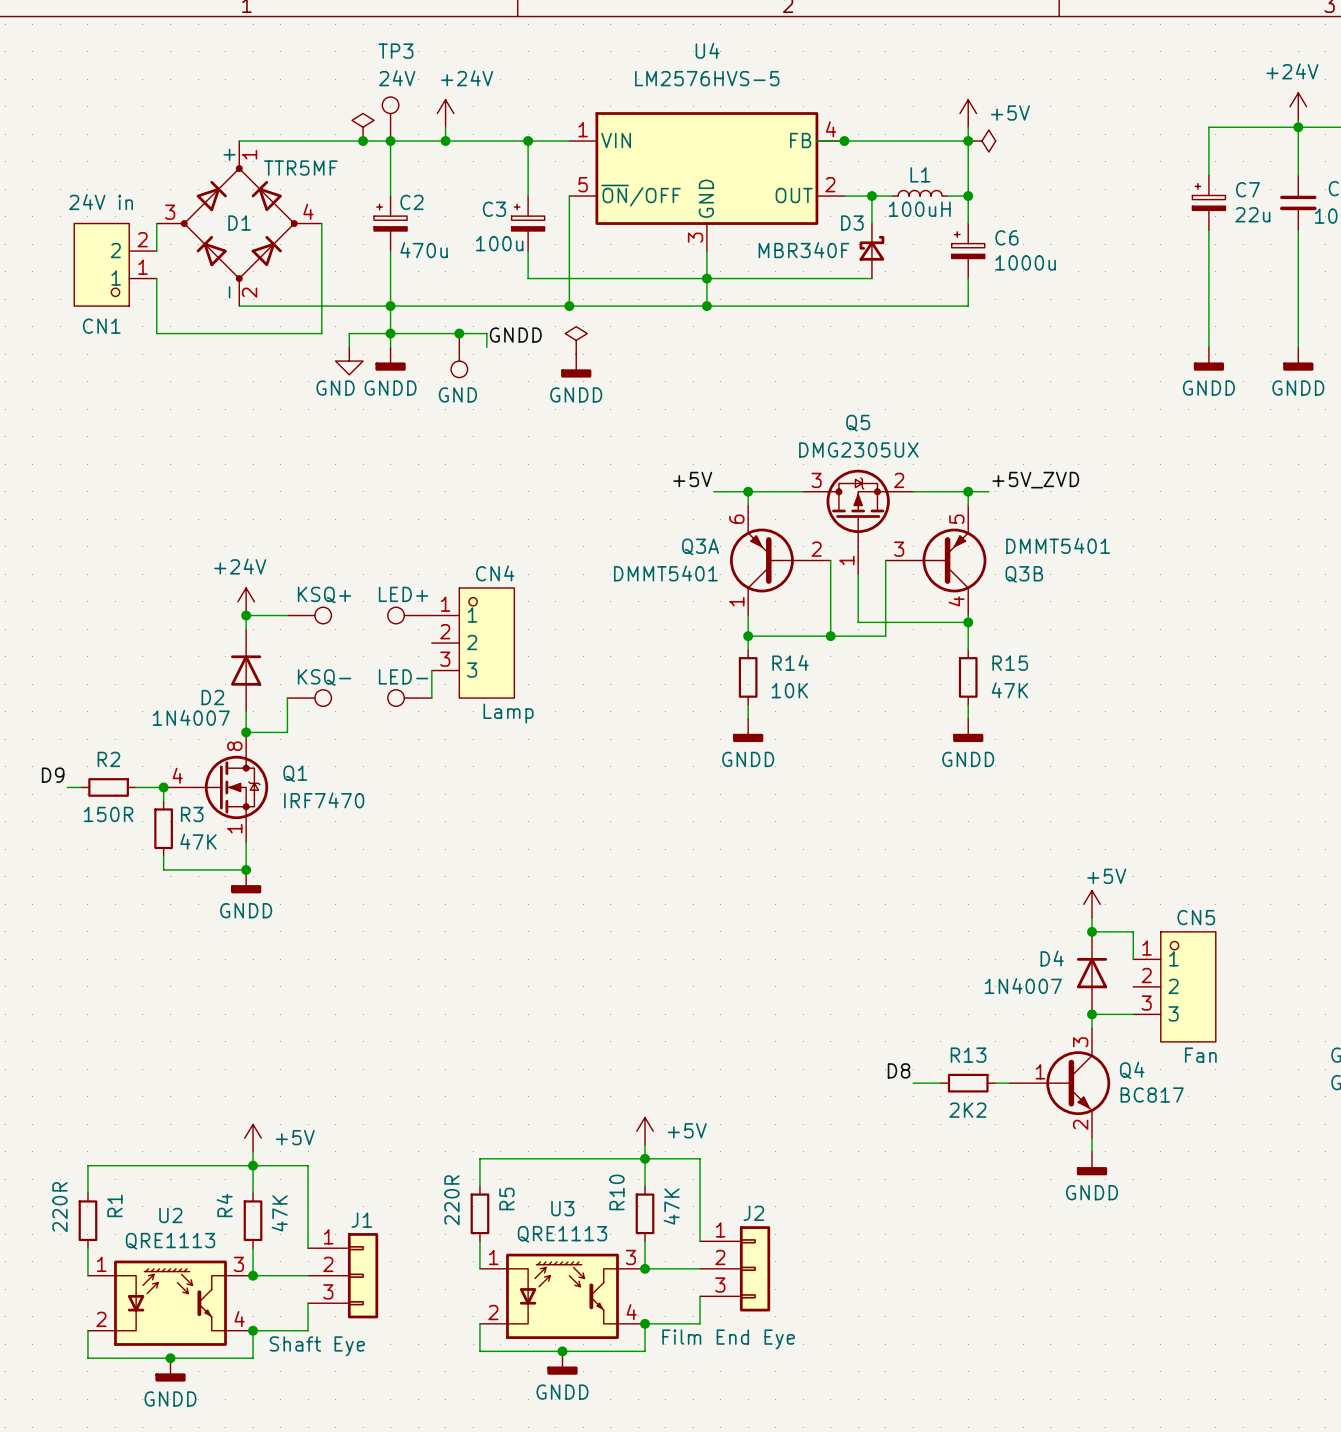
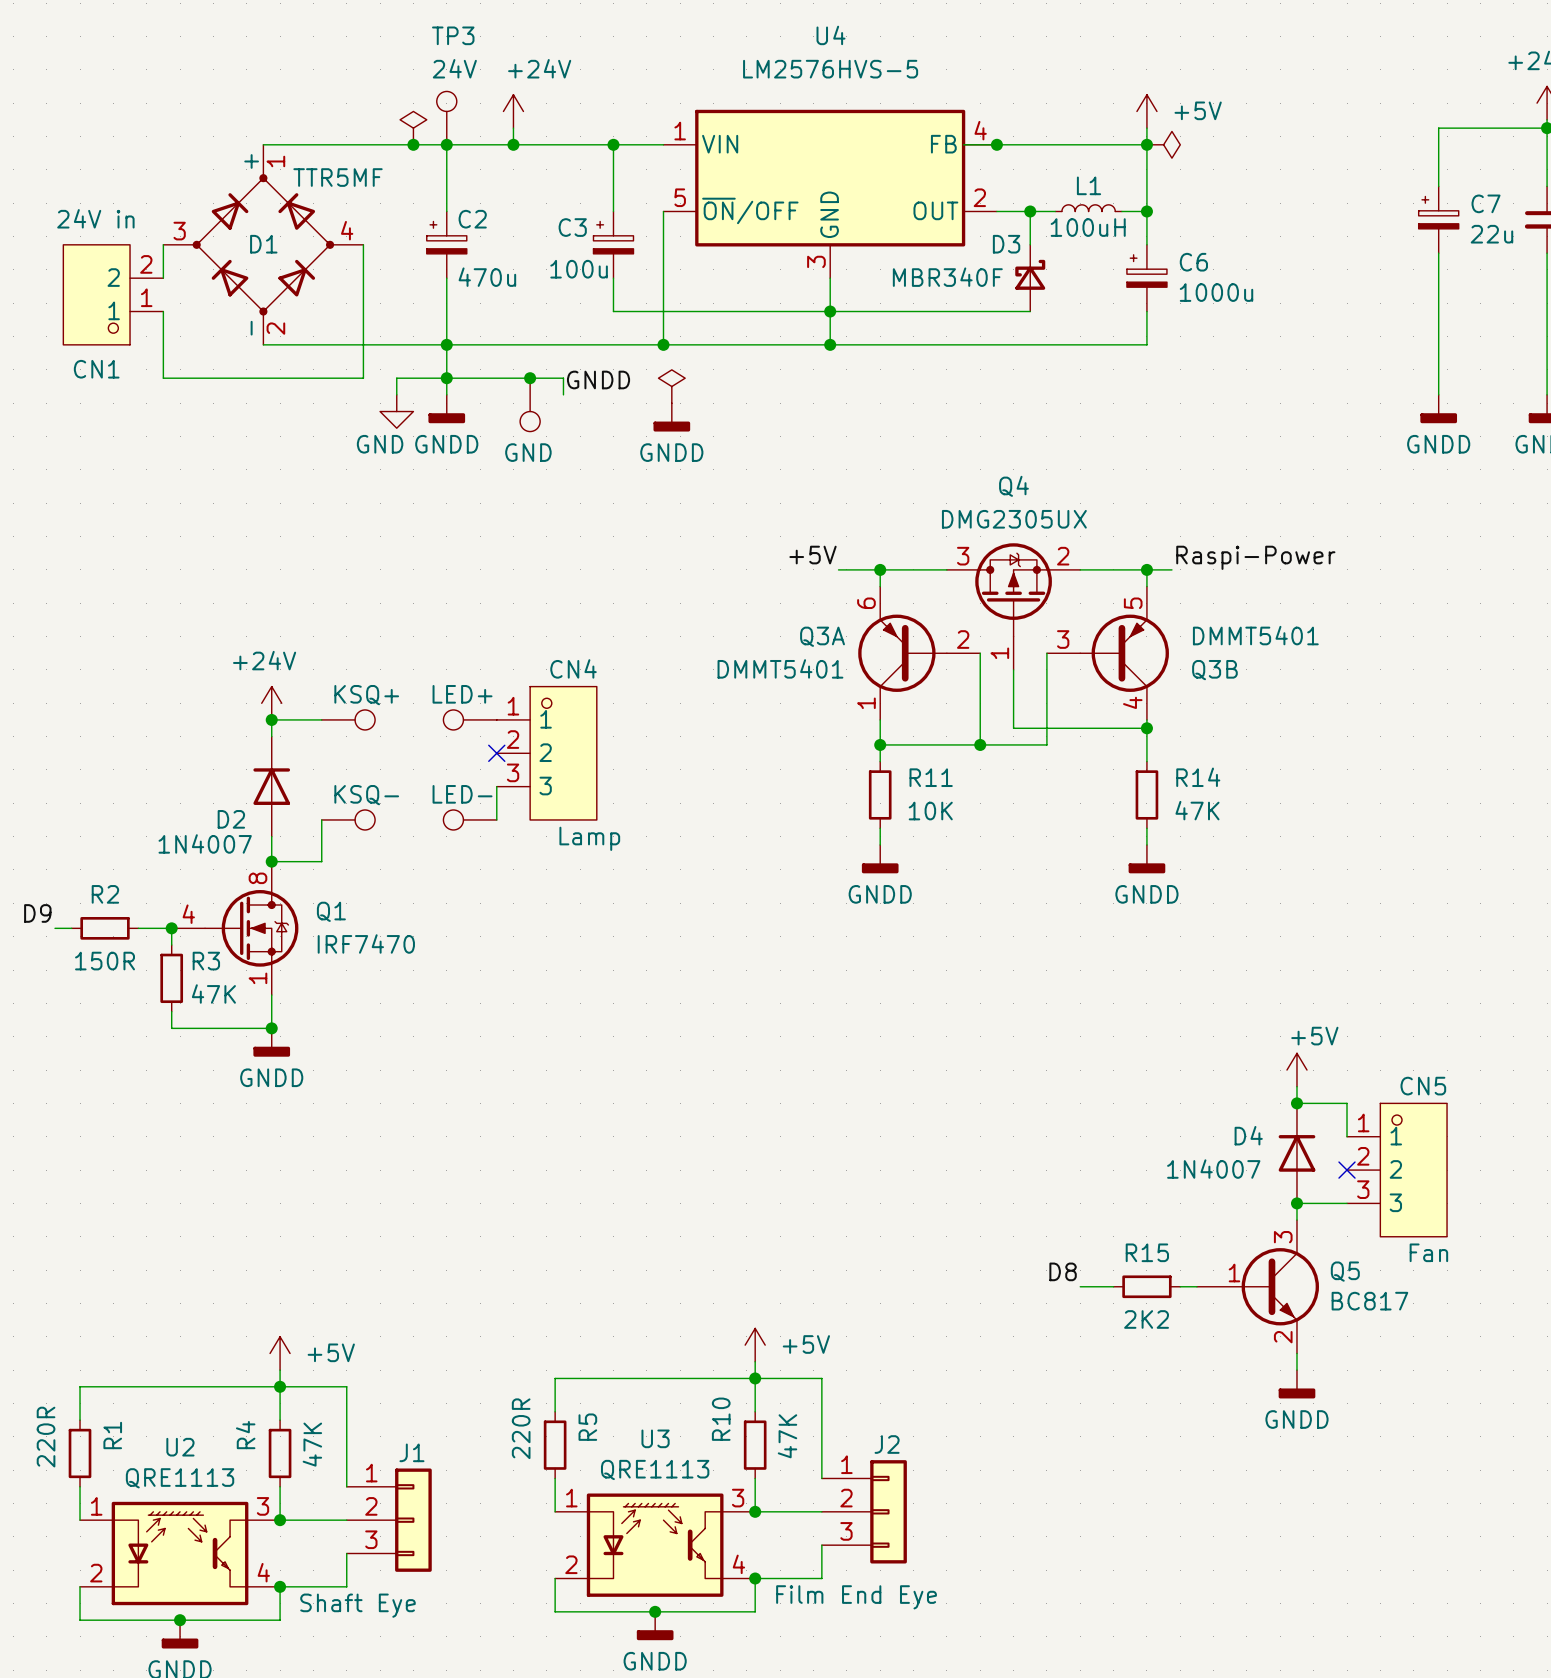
Q5 name: Q5 (858, 423) -> Q4 (1013, 486)
label: +5V_ZVD (1035, 480) -> Raspi-Power (1255, 557)
no-connect mark: none -> (496, 753)
R14 name: R14 (790, 662) -> R11 (931, 777)
R15 name: R15 (1010, 663) -> R14 (1198, 777)
no-connect mark: none -> (1347, 1170)
R13 name: R13 (968, 1055) -> R15 (1147, 1252)
Q4 name: Q4 (1132, 1070) -> Q5 (1345, 1271)

